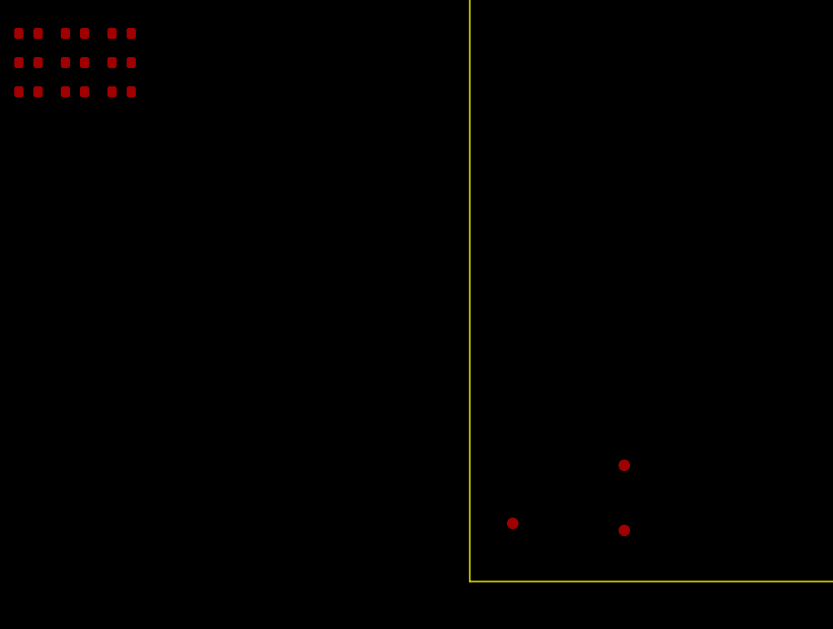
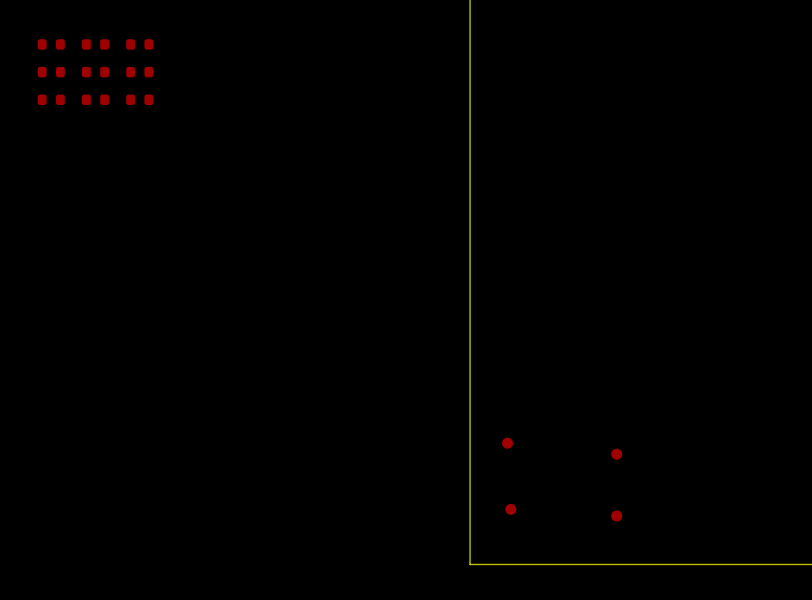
part: none -> (507, 443)

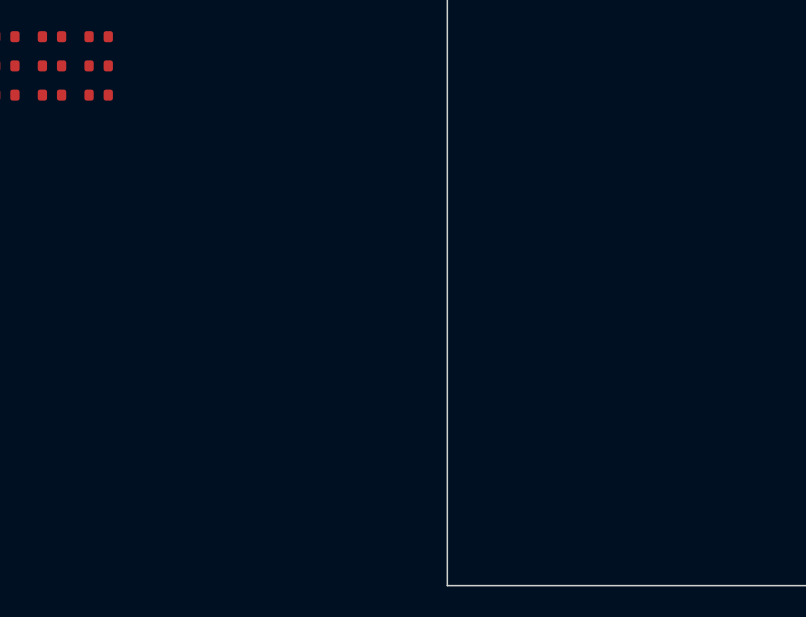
part: (507, 443) -> none
part: (616, 454) -> none
part: (510, 509) -> none
part: (616, 515) -> none

